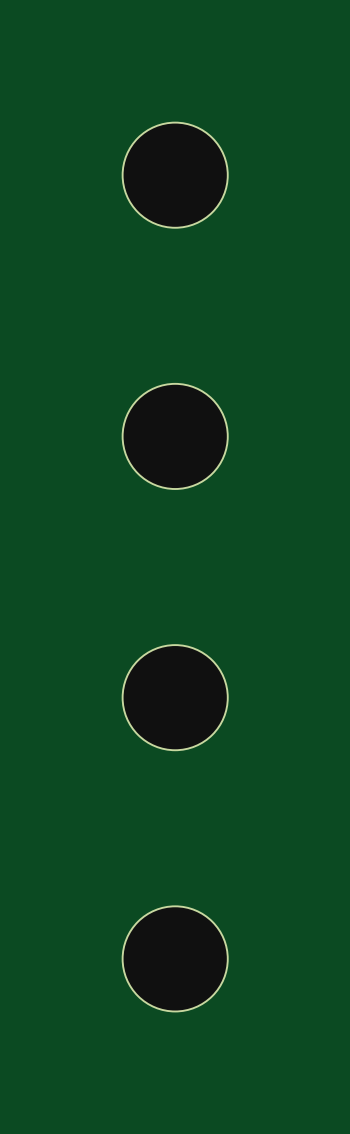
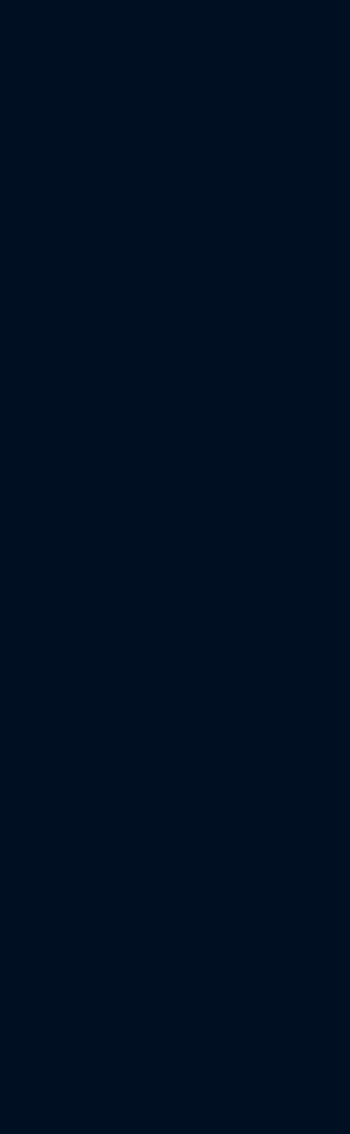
part: (175, 175) -> none
part: (175, 436) -> none
part: (175, 697) -> none
part: (175, 958) -> none

